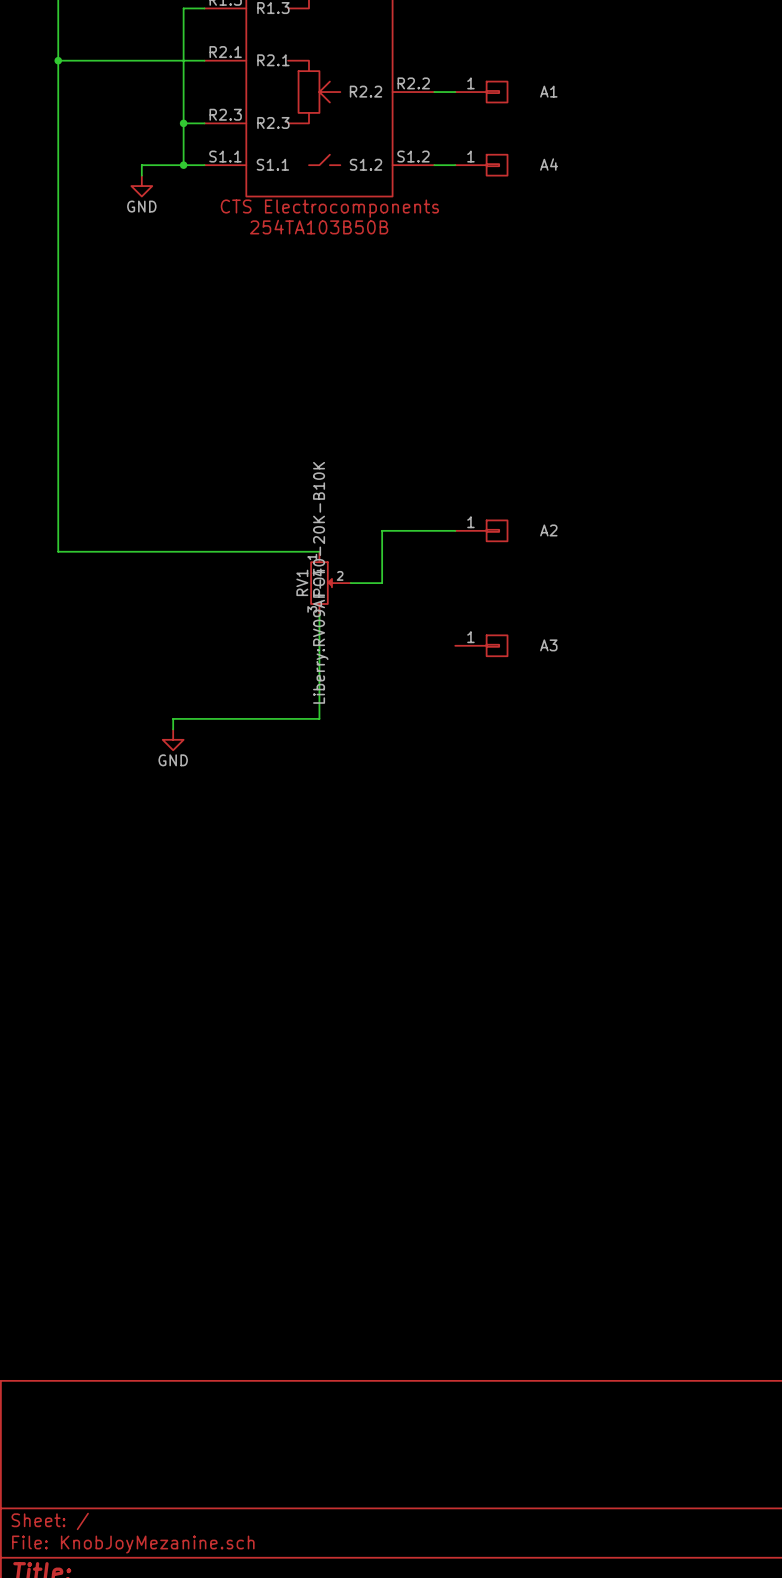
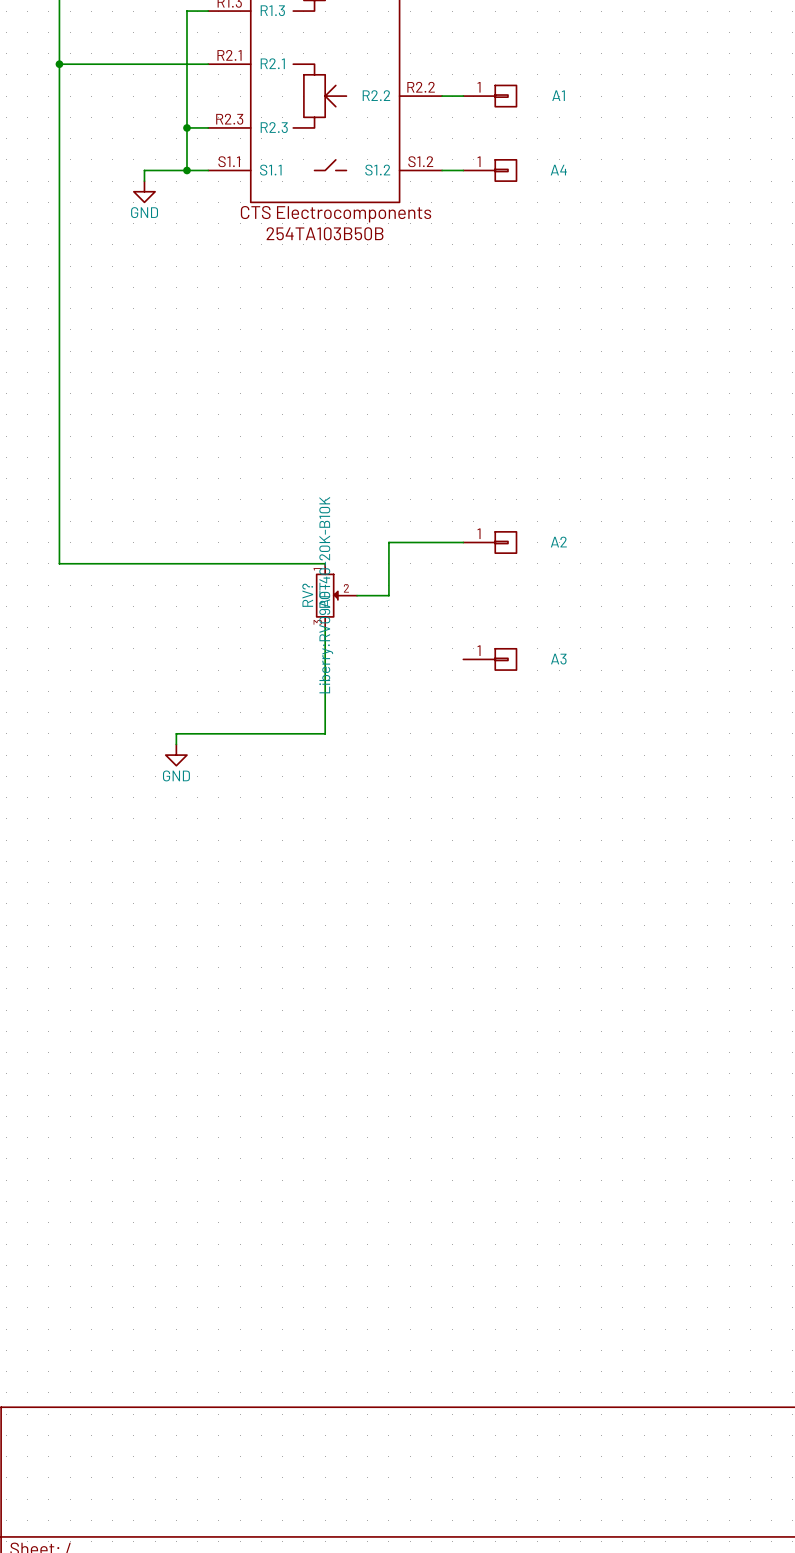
RV1 name: RV1 (302, 582) -> RV? (307, 595)

